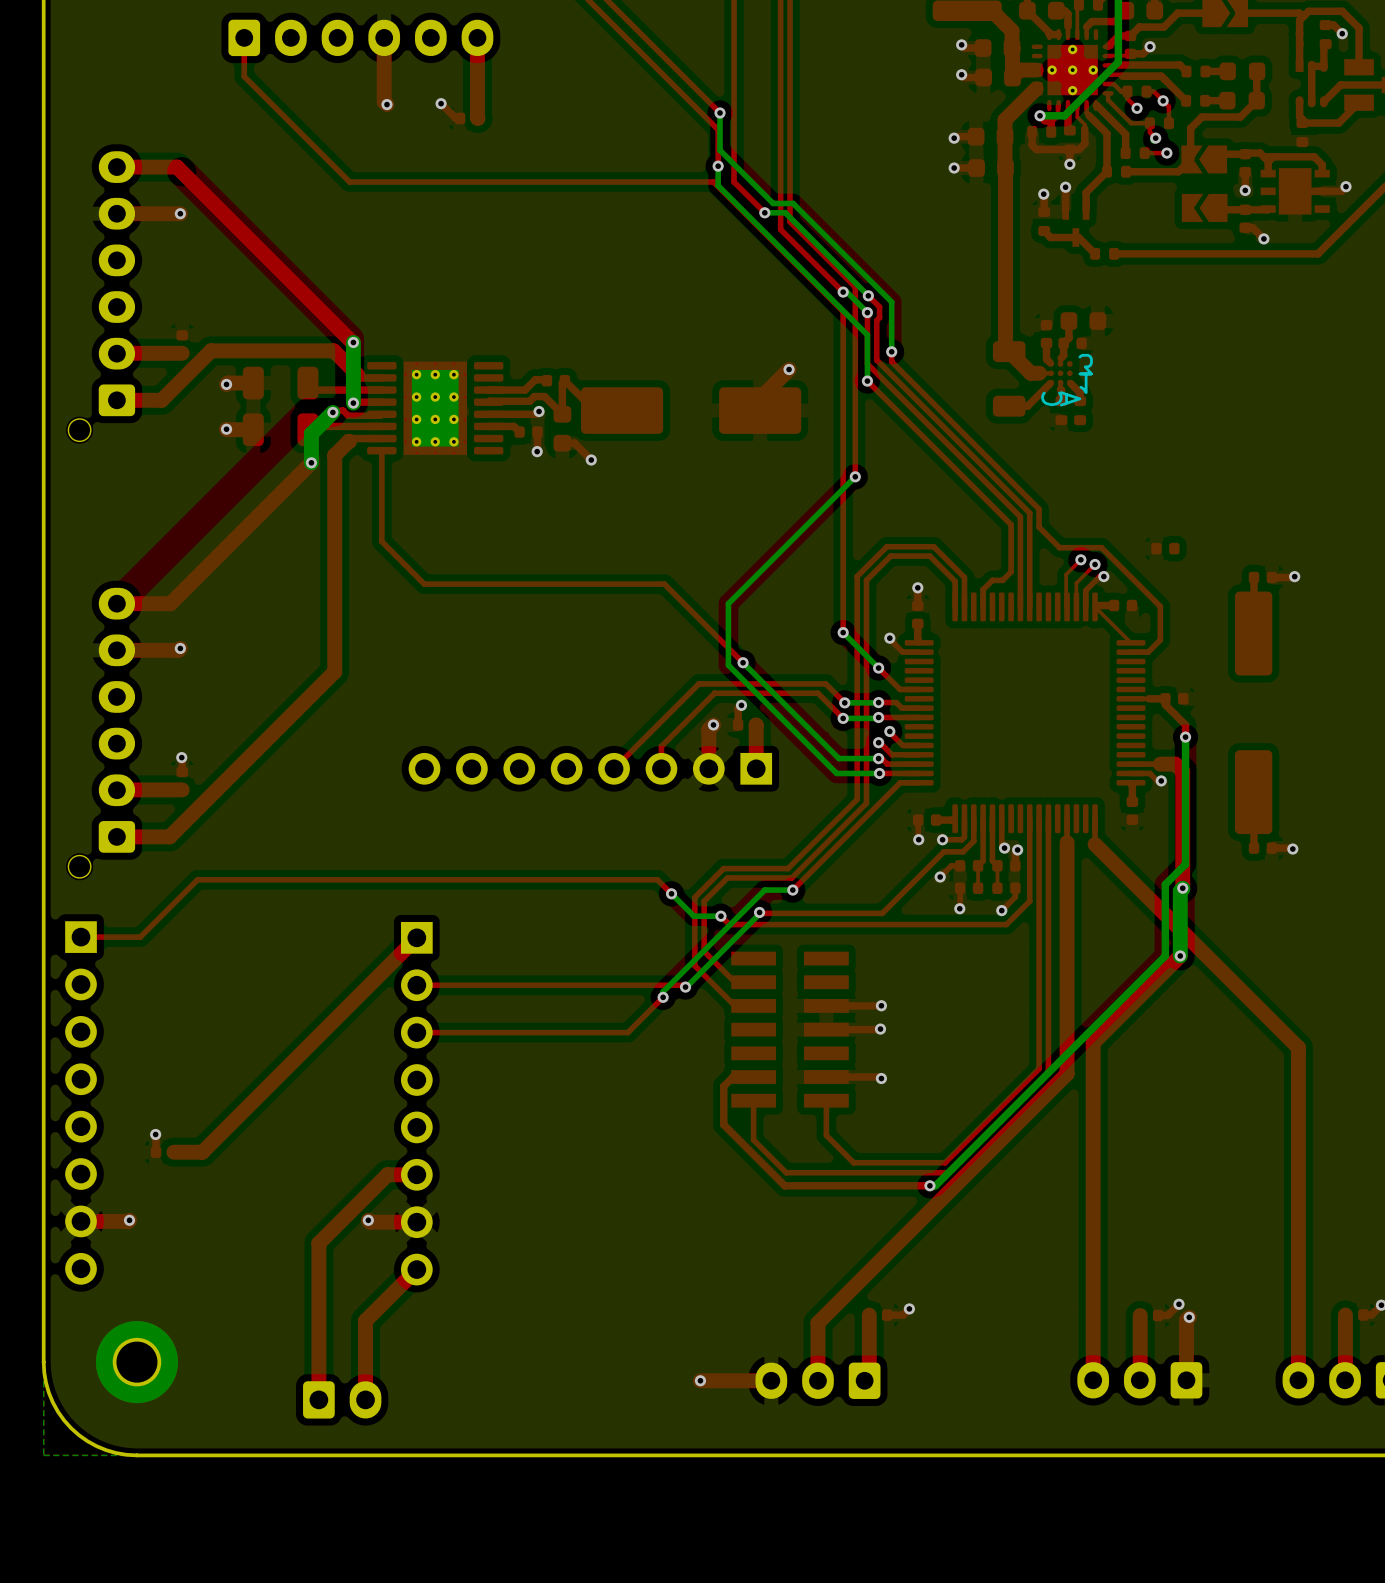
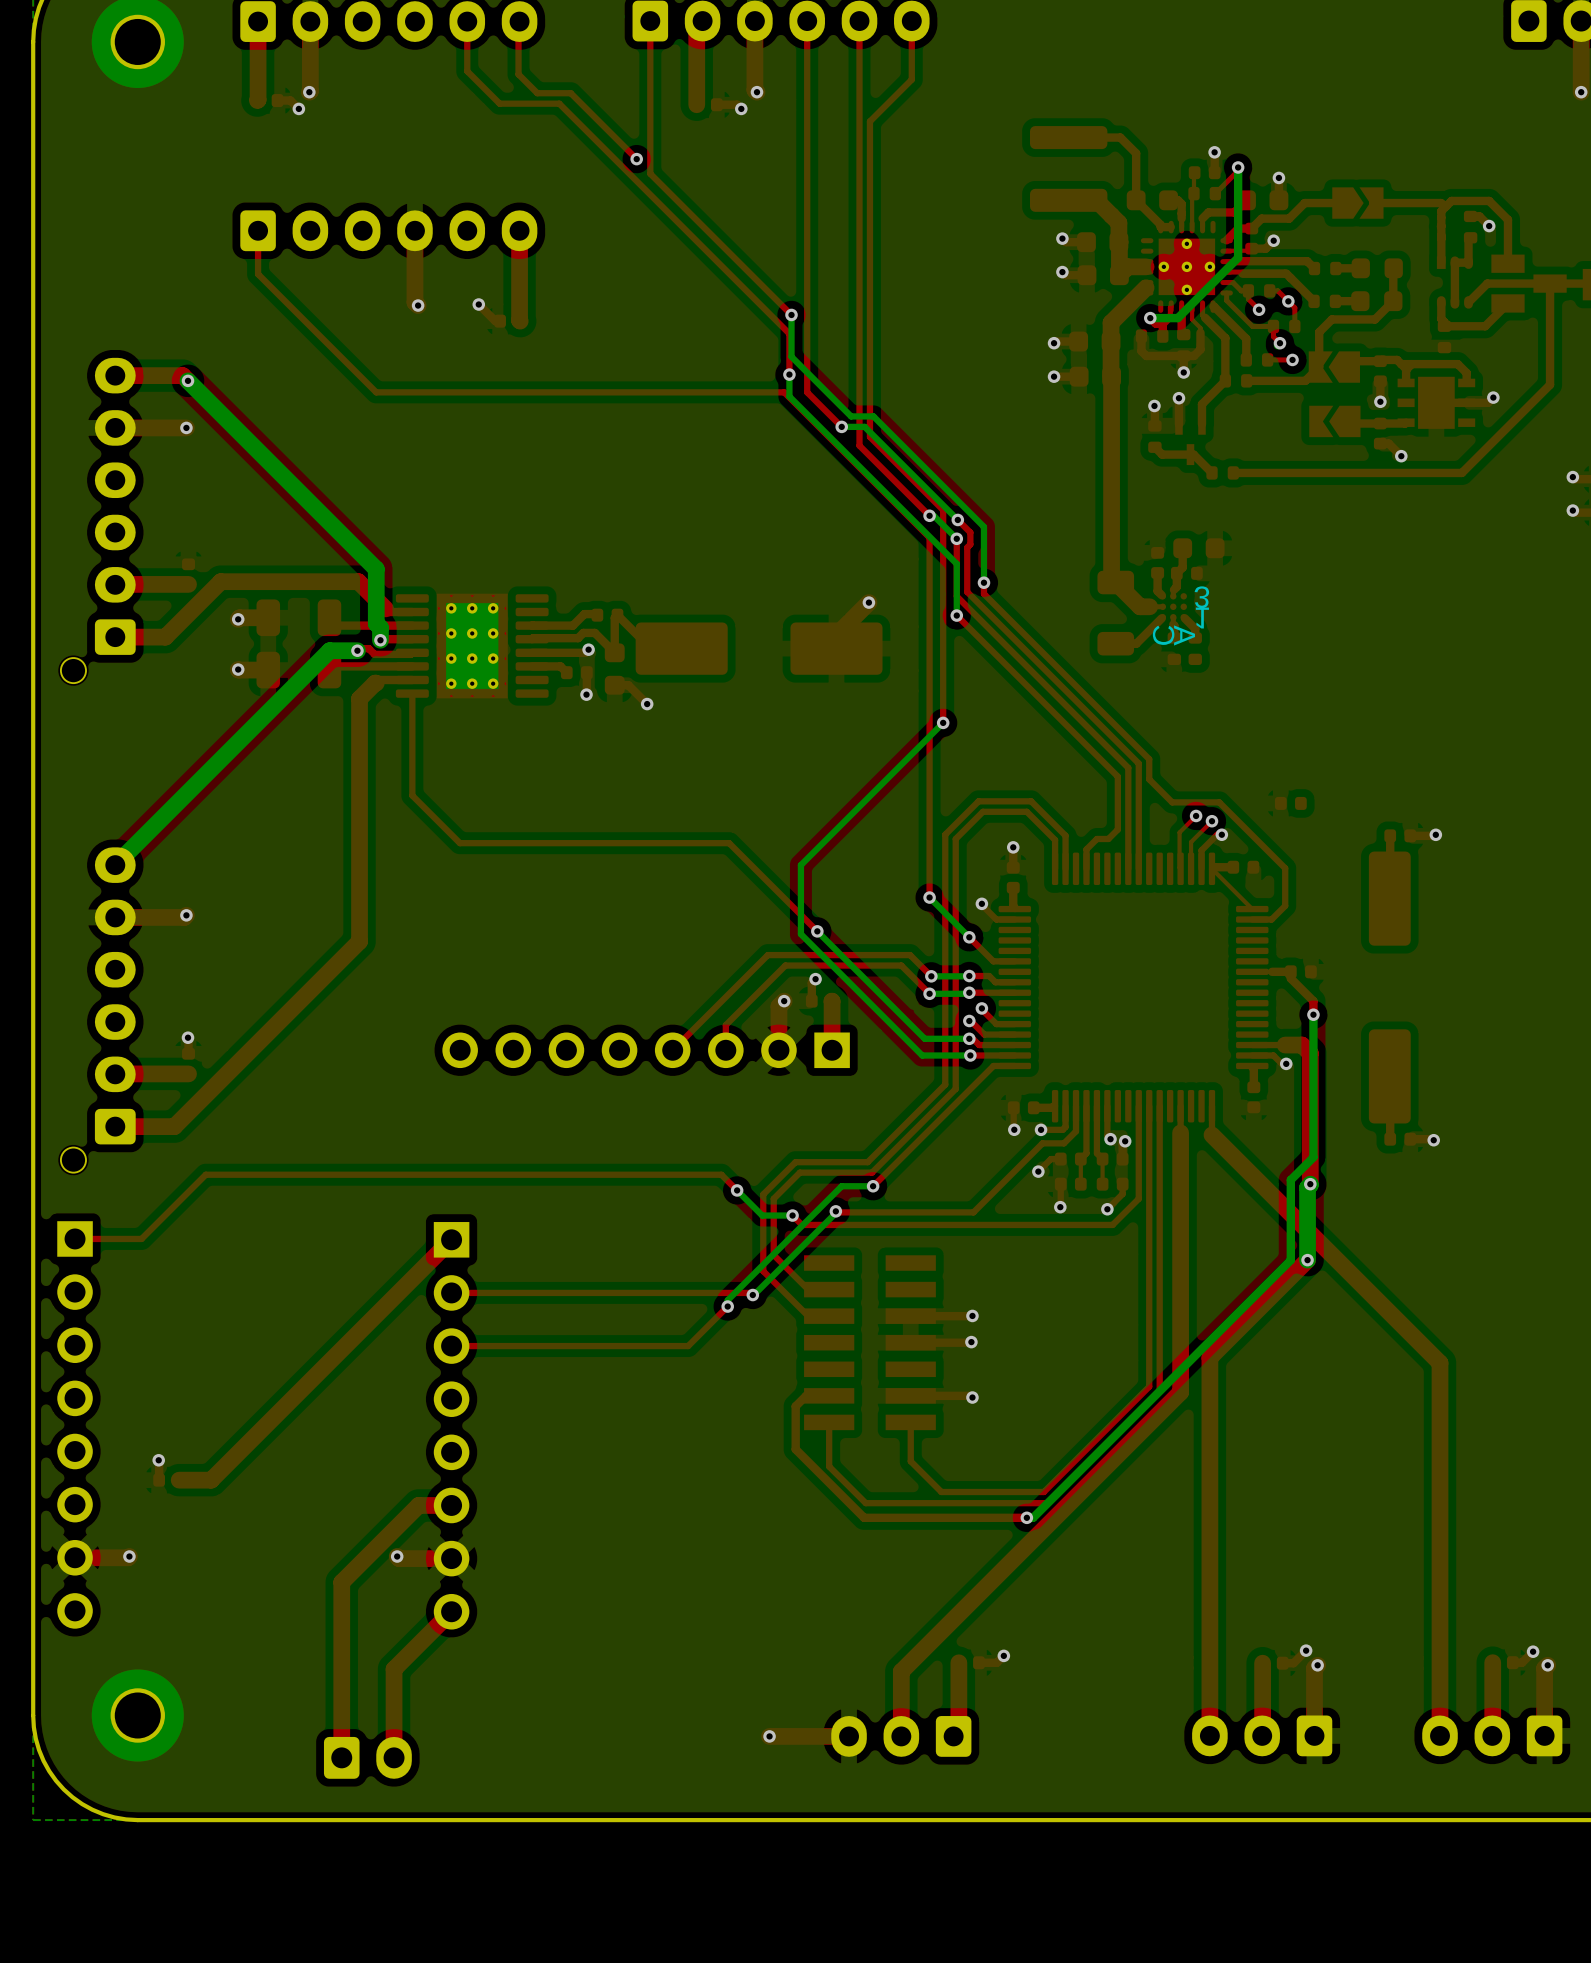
top track: (181, 171) (353, 342) -> none
via: none -> (187, 380)
bottom track: (353, 342) (353, 391) -> (187, 380) (376, 569) (376, 623) (380, 627)
via: (353, 342) -> none
bottom track: (332, 412) (311, 433) (311, 462) -> (357, 650) (329, 650) (115, 865)
top track: (311, 462) (170, 603) (116, 603) -> none
via: (311, 462) -> none

